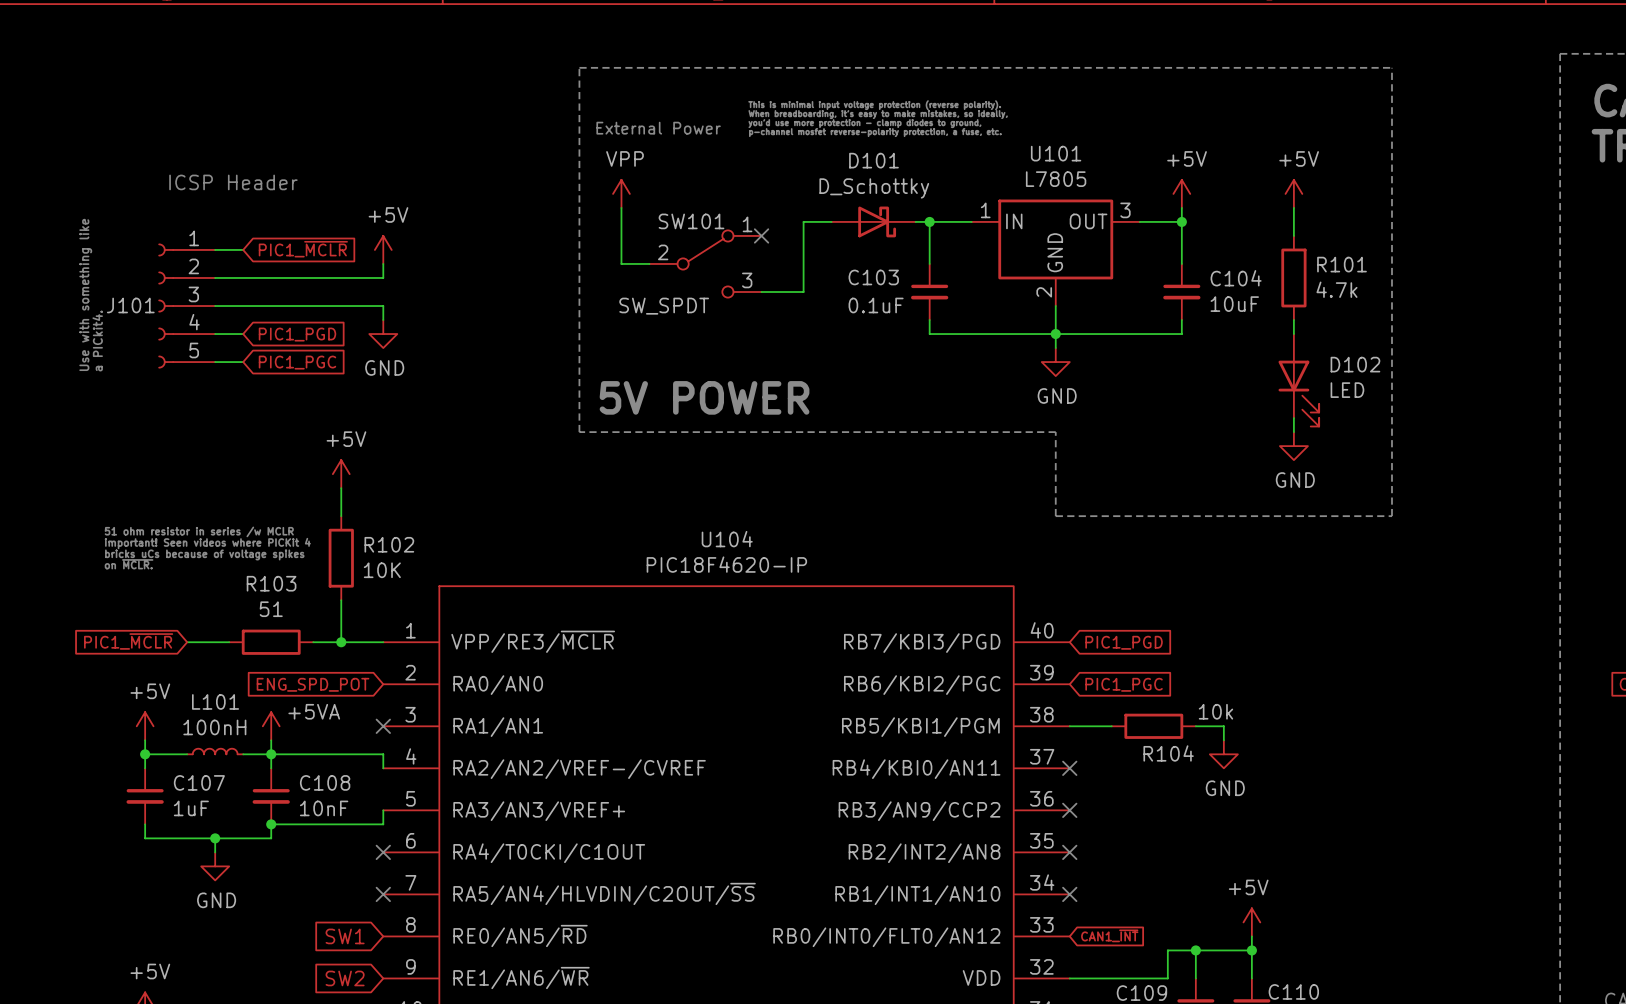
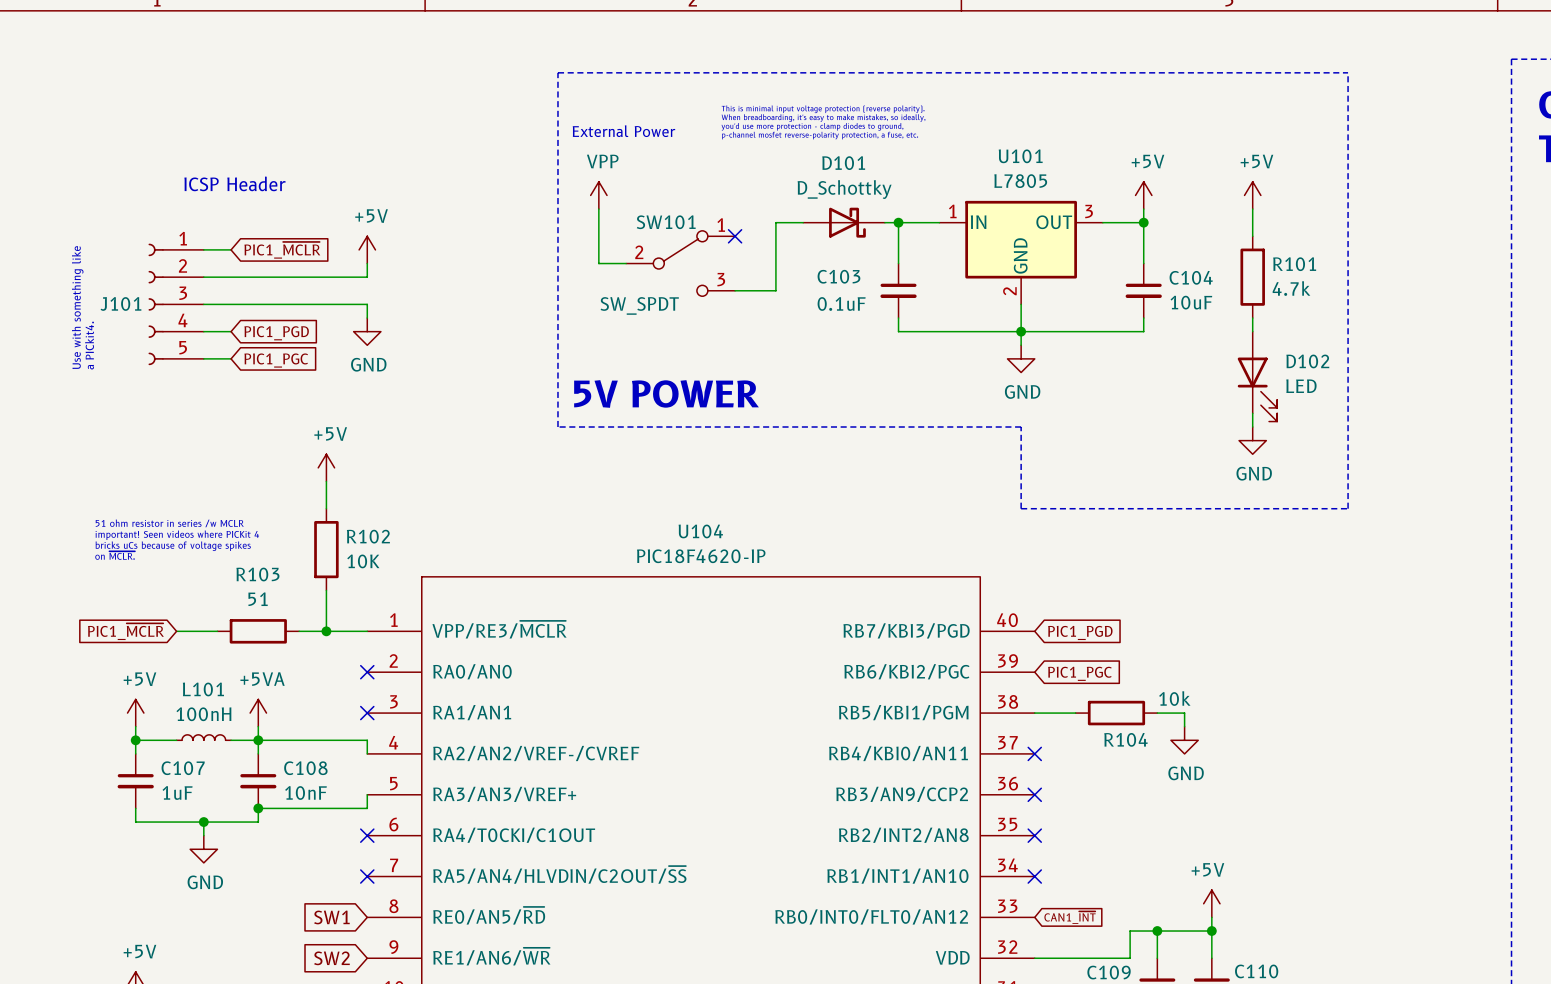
global label: ENG_SPD_POT (313, 684) -> none
no-connect mark: none -> (367, 672)
power symbol text position: +5VA (314, 711) -> +5VA (262, 679)

